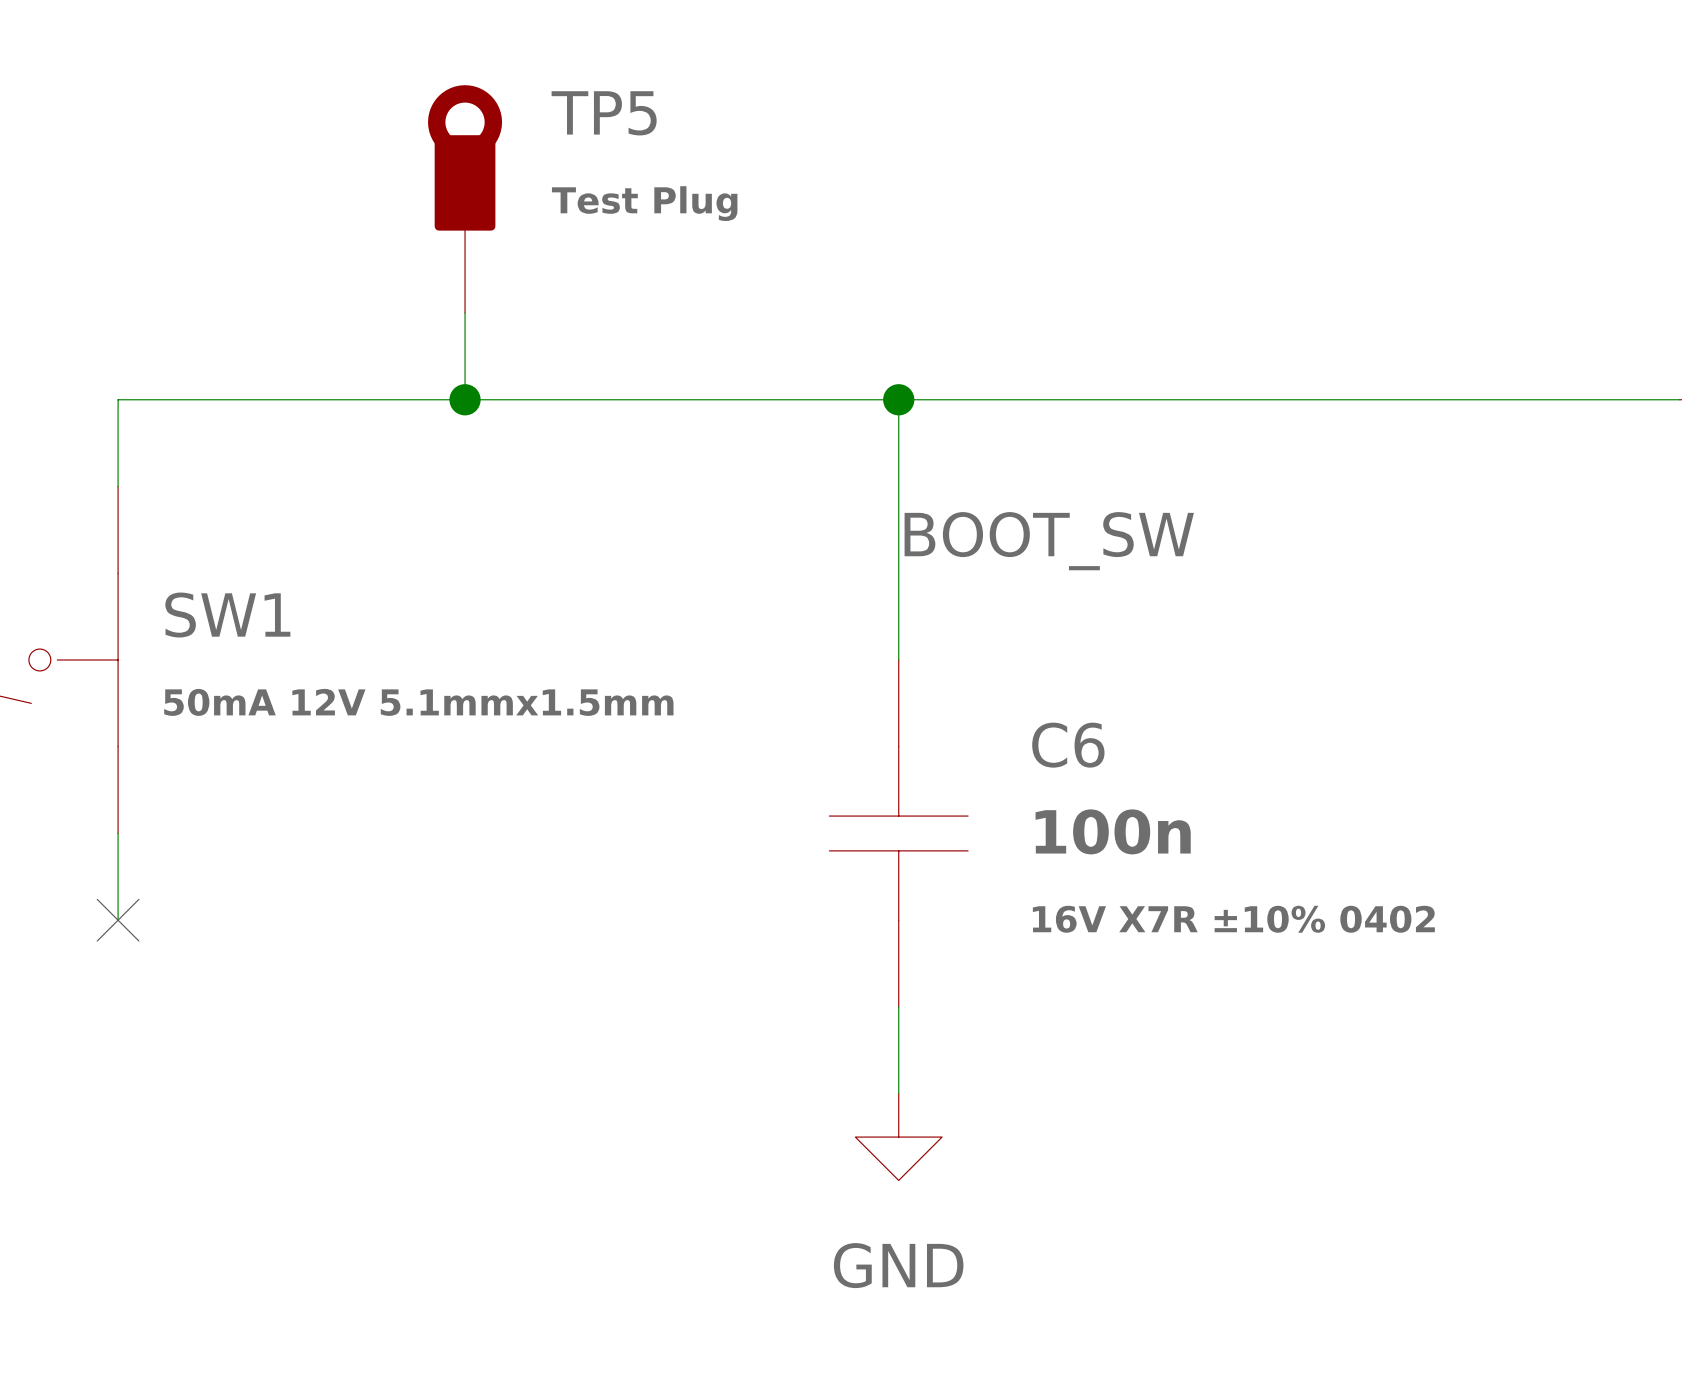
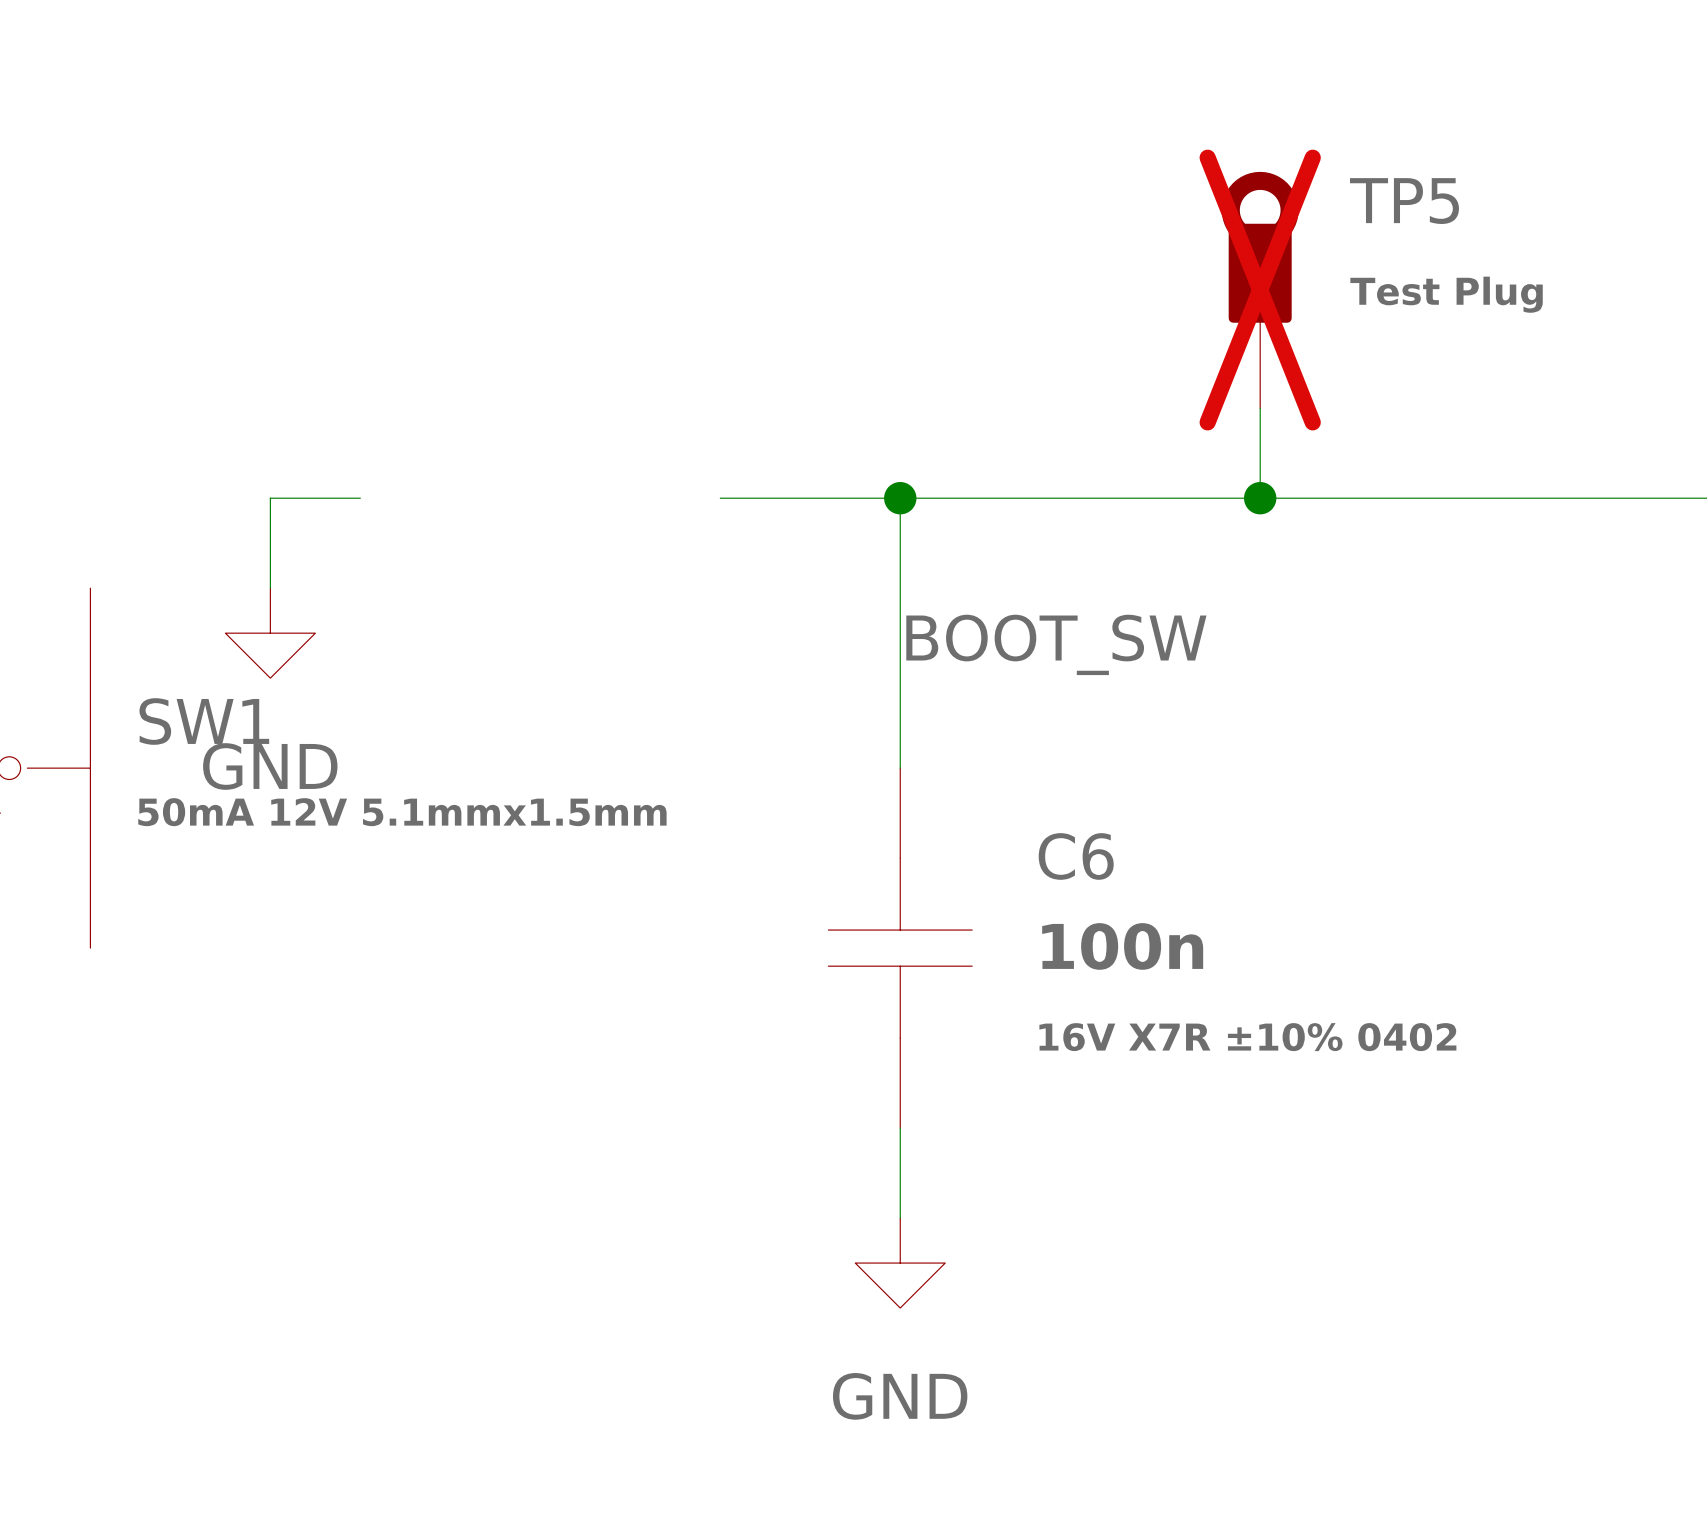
TP5 position: (465, 199) -> (1260, 290)
TP5 do-not-place cross: none -> (1260, 290)
wire: (465, 313) (465, 399) -> (1260, 408) (1260, 498)
wire: (291, 399) (118, 399) (118, 486) -> (270, 498) (270, 588)
wire: (378, 399) (725, 399) -> none
junction: (465, 399) -> none
junction: none -> (1260, 498)
power symbol: none -> GND (270, 633)
wire: (118, 833) (118, 920) -> none
no-connect mark: (118, 920) -> none

